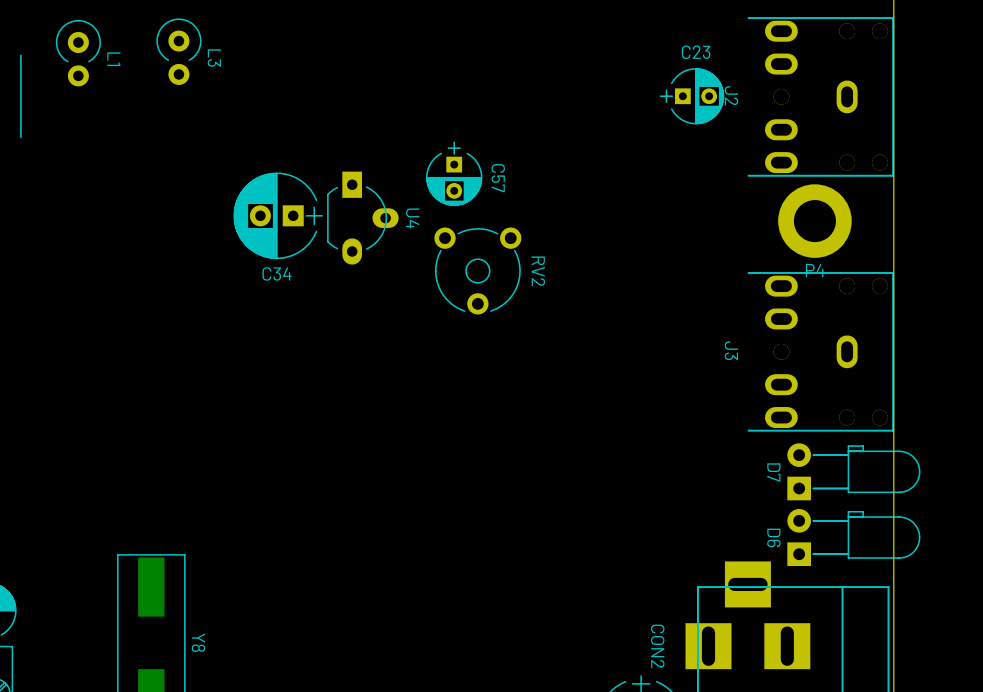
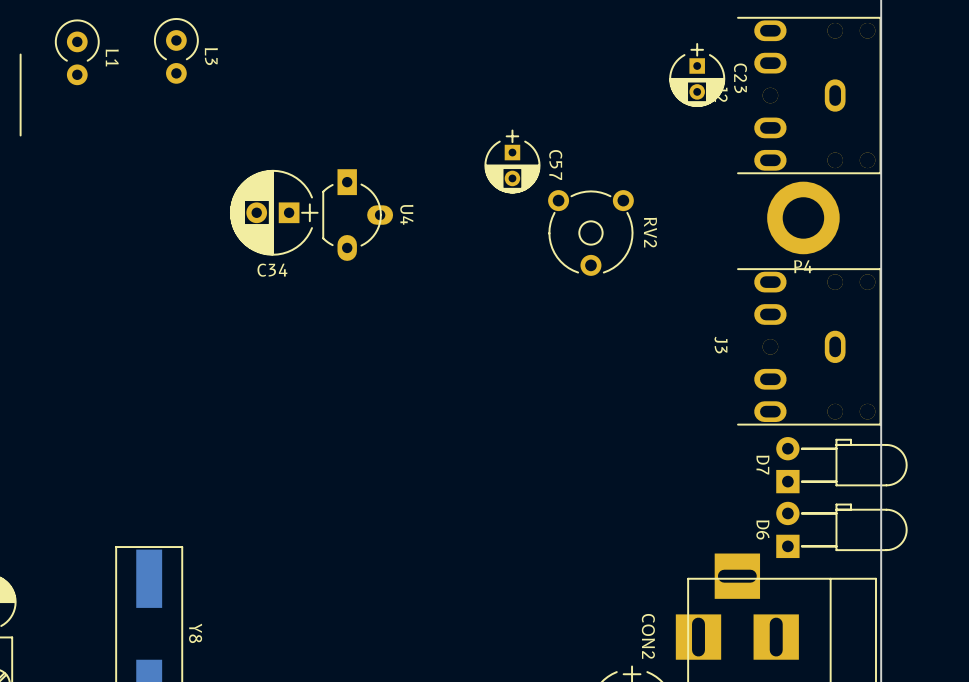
C23 rotation: 0° (692, 96) -> 90° clockwise (697, 75)
C57 position: (454, 173) -> (512, 161)
RV2 position: (477, 271) -> (590, 232)

